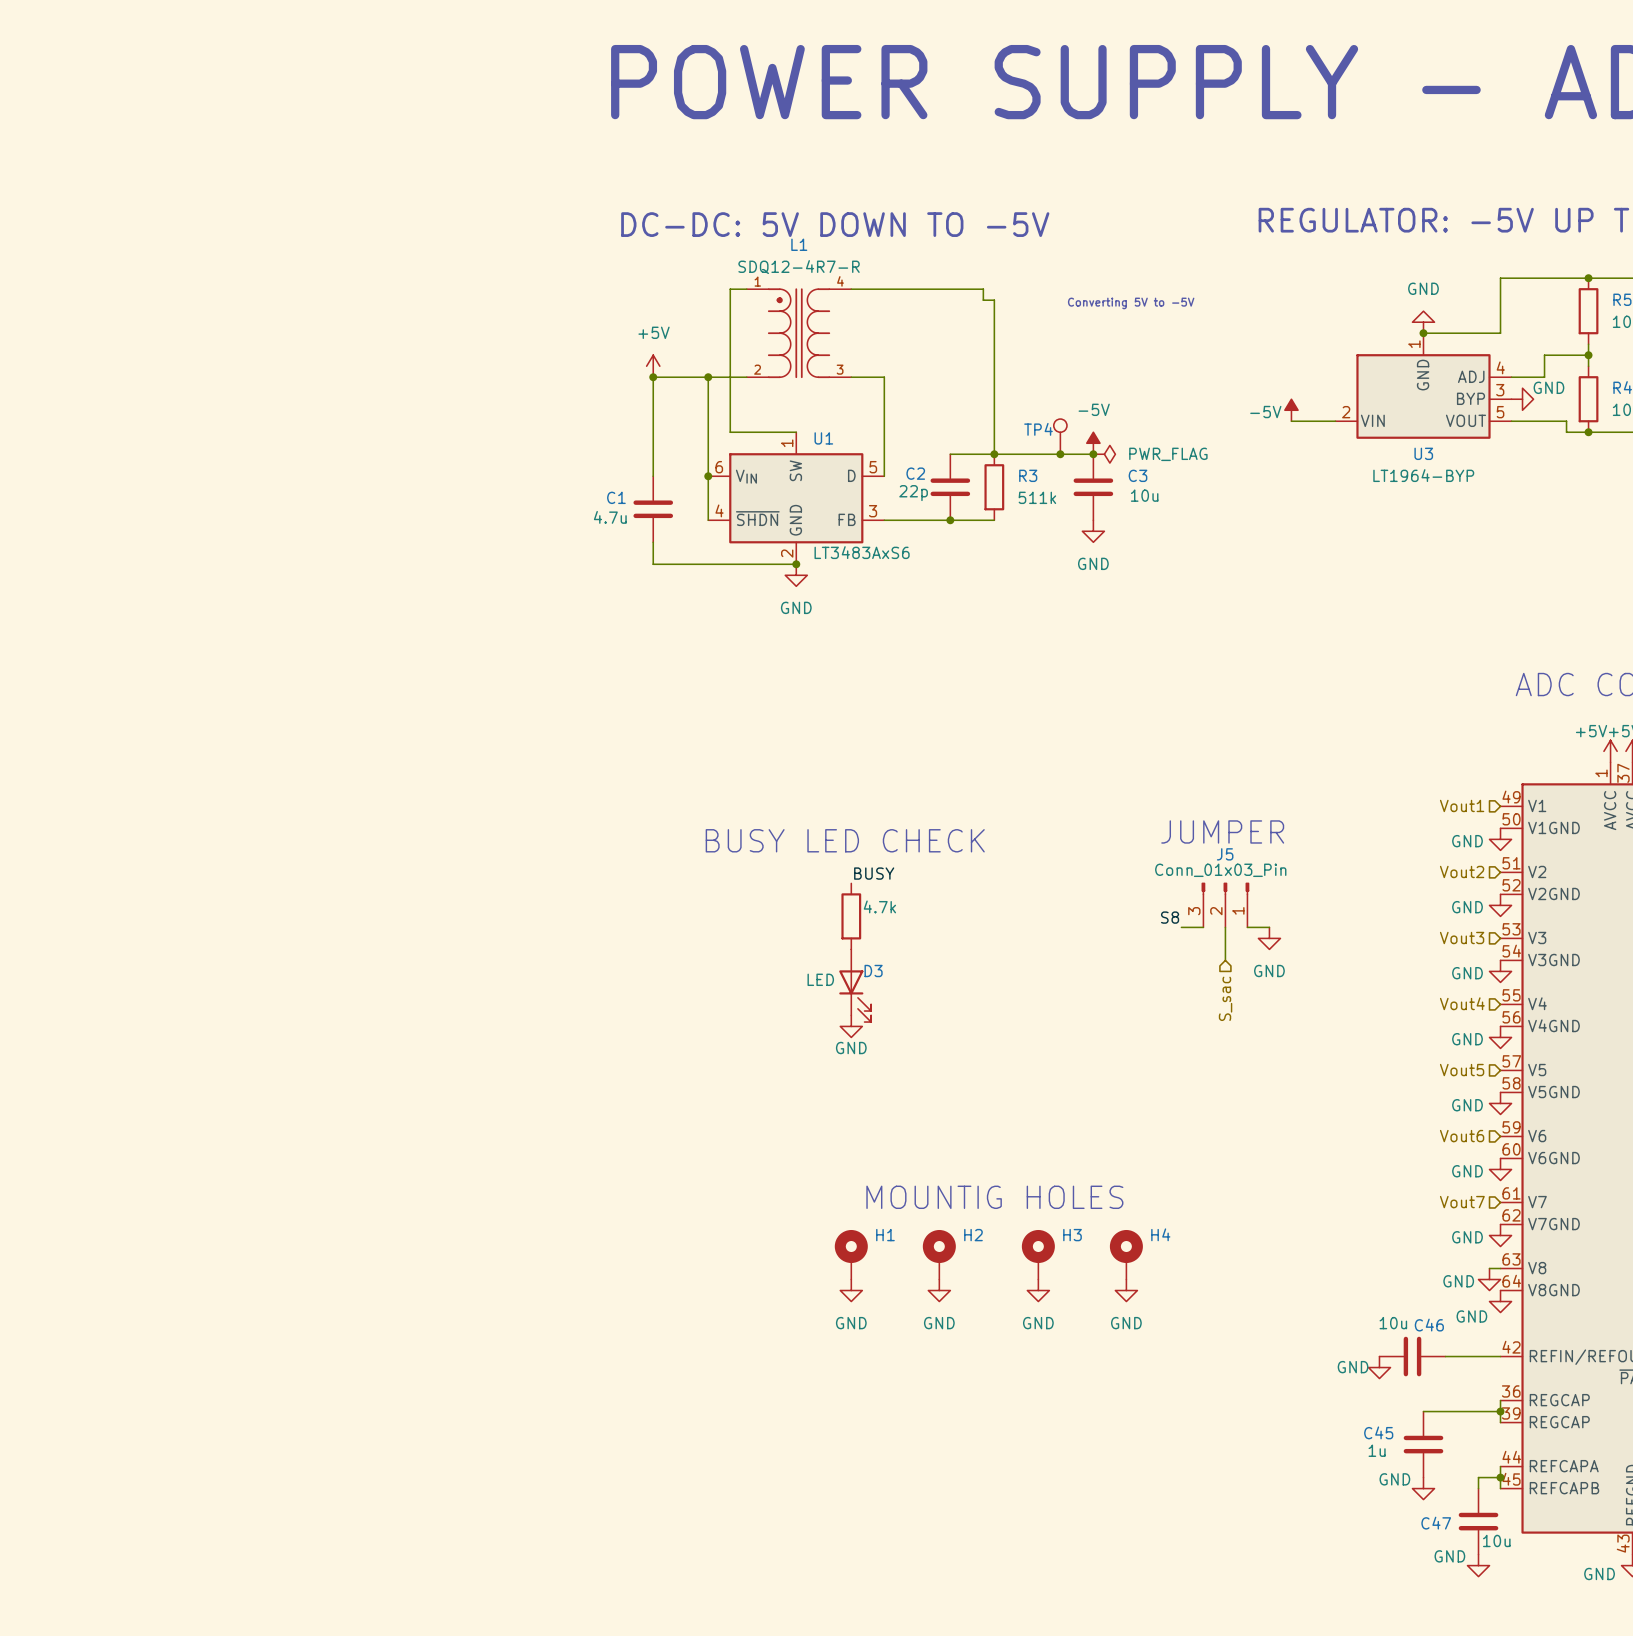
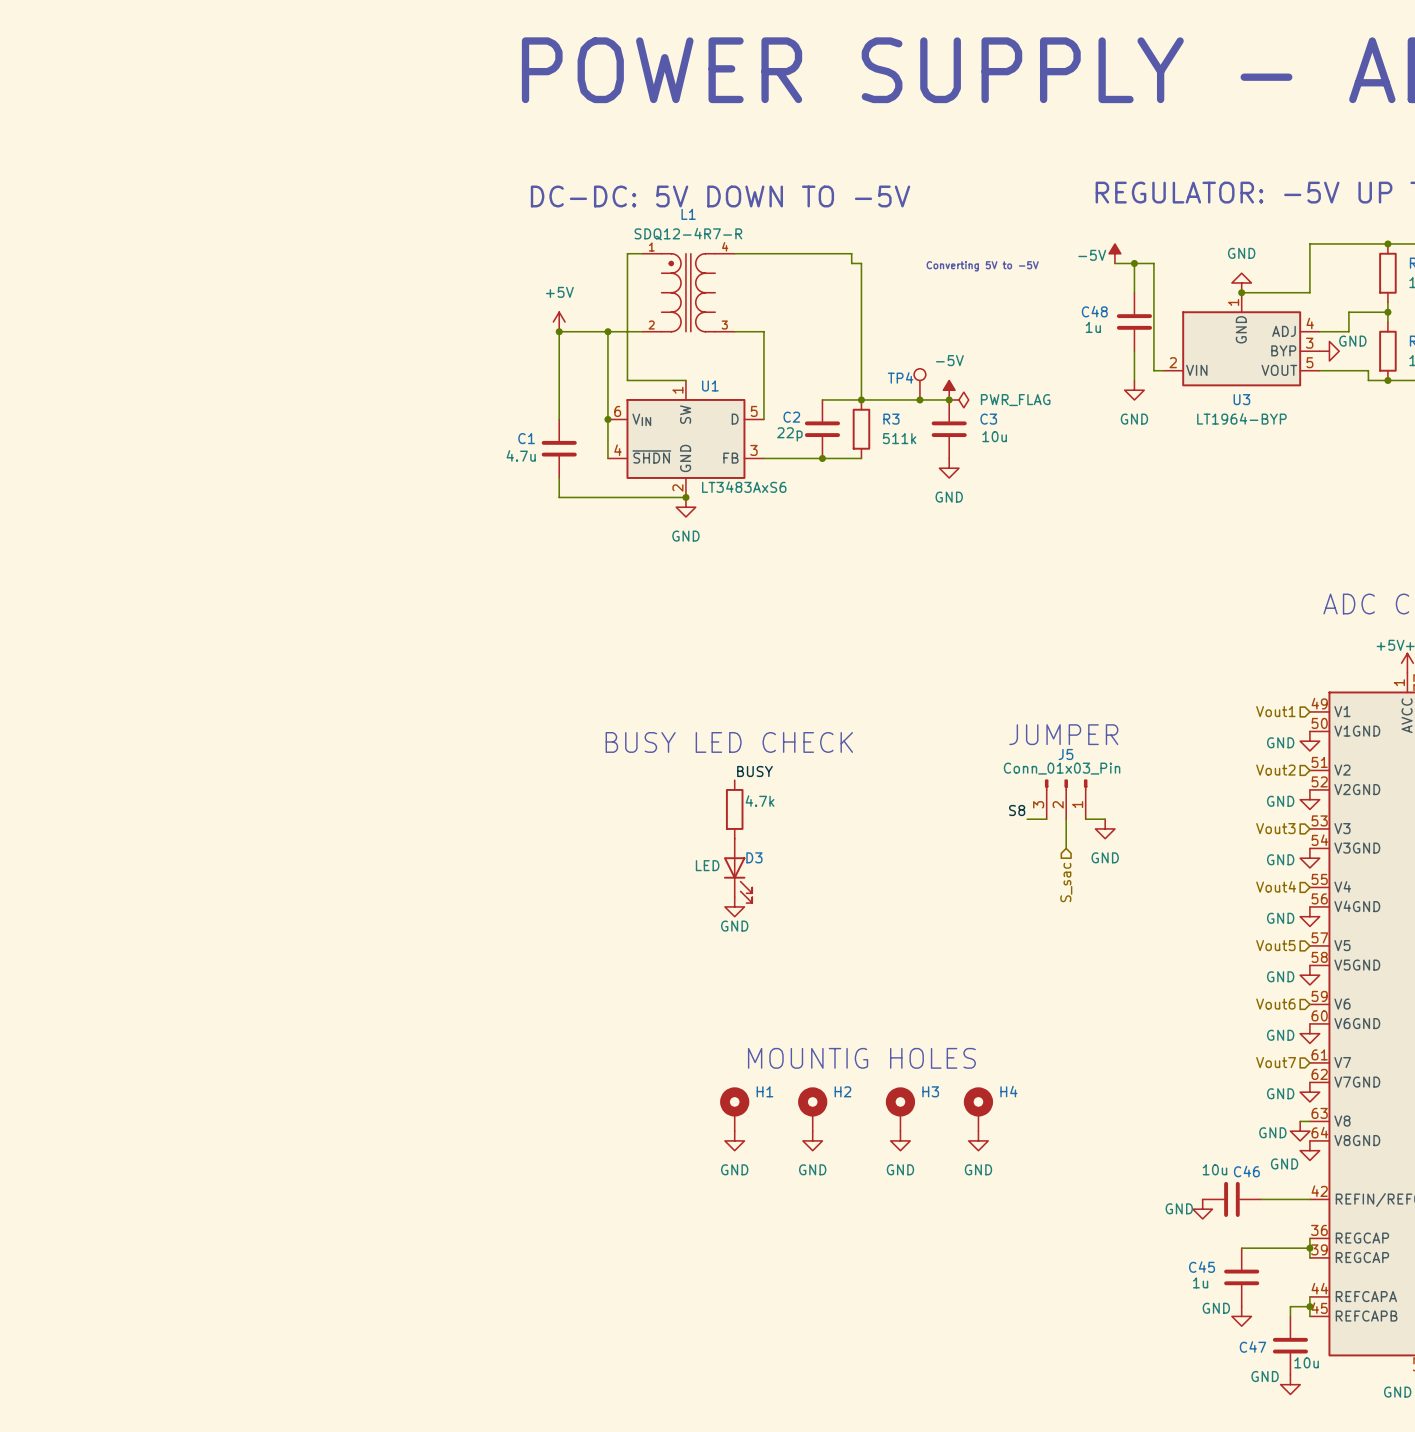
wire: none -> (1134, 263) (1134, 292)
junction: none -> (1134, 263)
C48: none -> 1u (1134, 321)
wire: none -> (1134, 351) (1134, 380)
power symbol position: -5V (1291, 410) -> -5V (1114, 253)
wire: (1291, 421) (1324, 421) -> (1114, 263) (1153, 263) (1153, 370)
power symbol: none -> GND (1134, 390)

